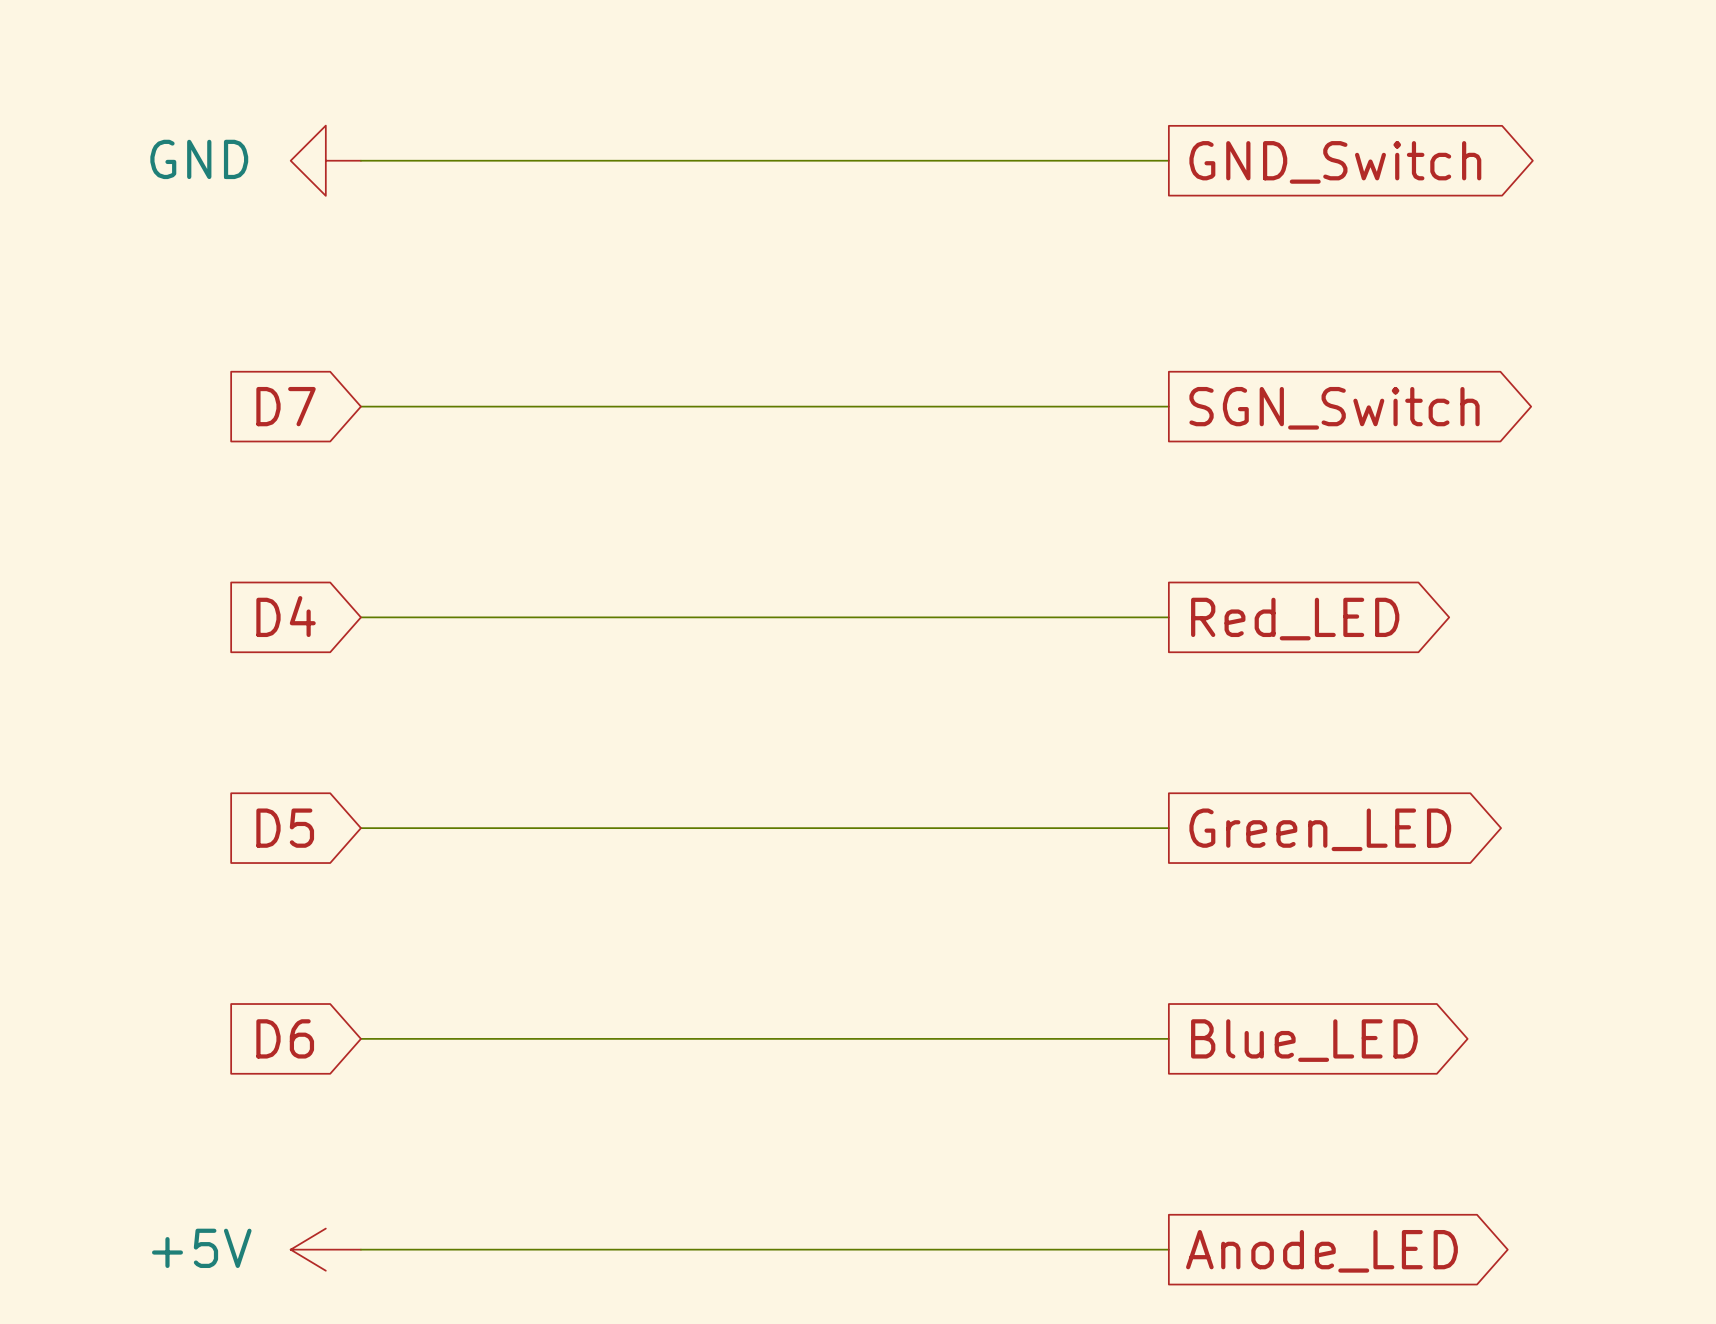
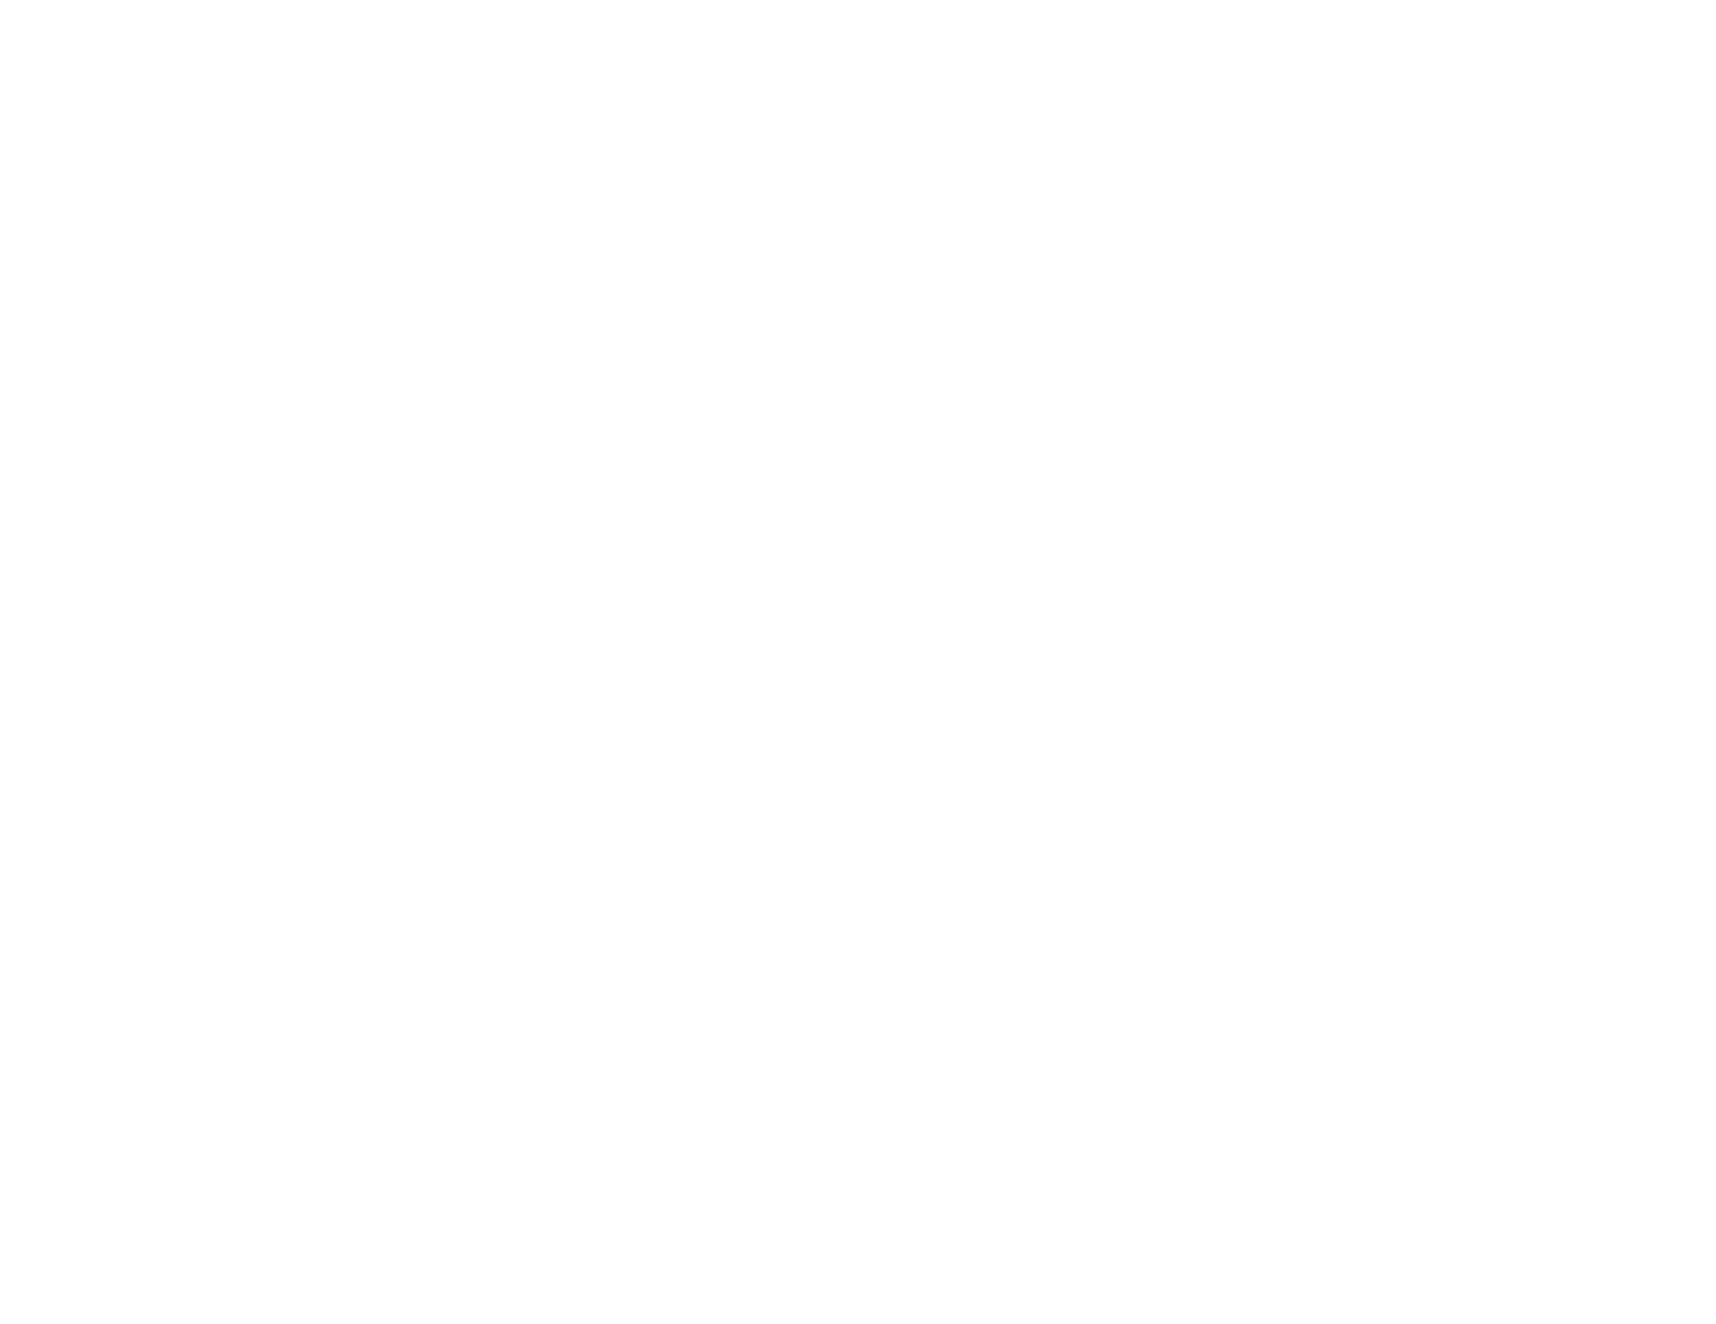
power symbol: GND (325, 160) -> none
wire: (360, 160) (1168, 160) -> none
global label: GND_Switch (1335, 162) -> none
global label: D7 (286, 406) -> none
wire: (360, 406) (1168, 406) -> none
global label: SGN_Switch (1334, 408) -> none
global label: D4 (286, 616) -> none
wire: (360, 617) (1168, 617) -> none
global label: Red_LED (1295, 619) -> none
global label: D5 (285, 828) -> none
wire: (360, 828) (1168, 828) -> none
global label: Green_LED (1320, 829) -> none
global label: D6 (285, 1038) -> none
wire: (360, 1038) (1168, 1038) -> none
global label: Blue_LED (1304, 1040) -> none
power symbol: +5V (325, 1249) -> none
wire: (360, 1249) (1168, 1249) -> none
global label: Anode_LED (1321, 1251) -> none

